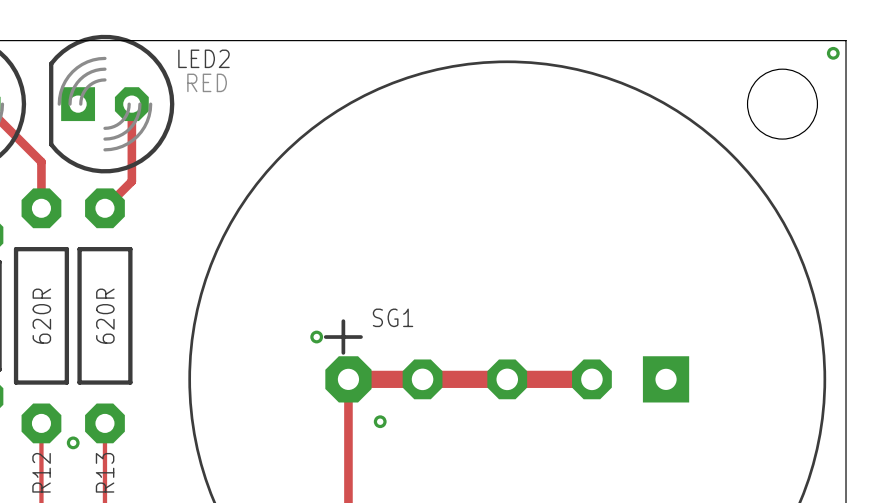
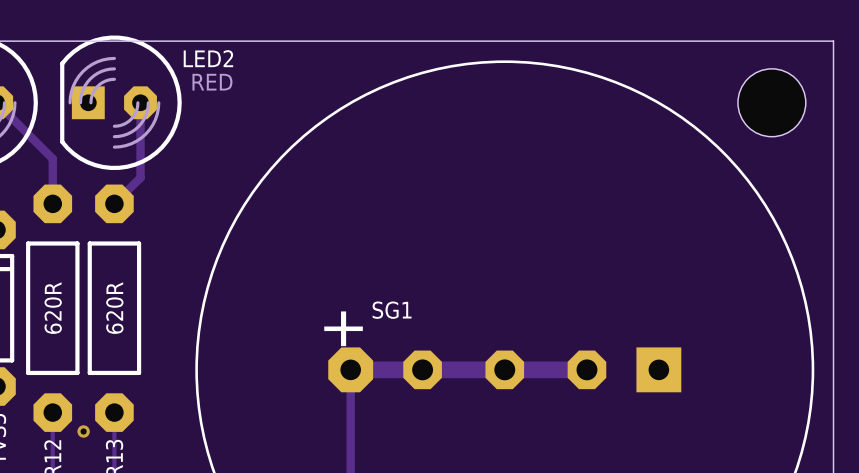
via: (833, 53) -> none
via: (316, 337) -> none
via: (380, 421) -> none

